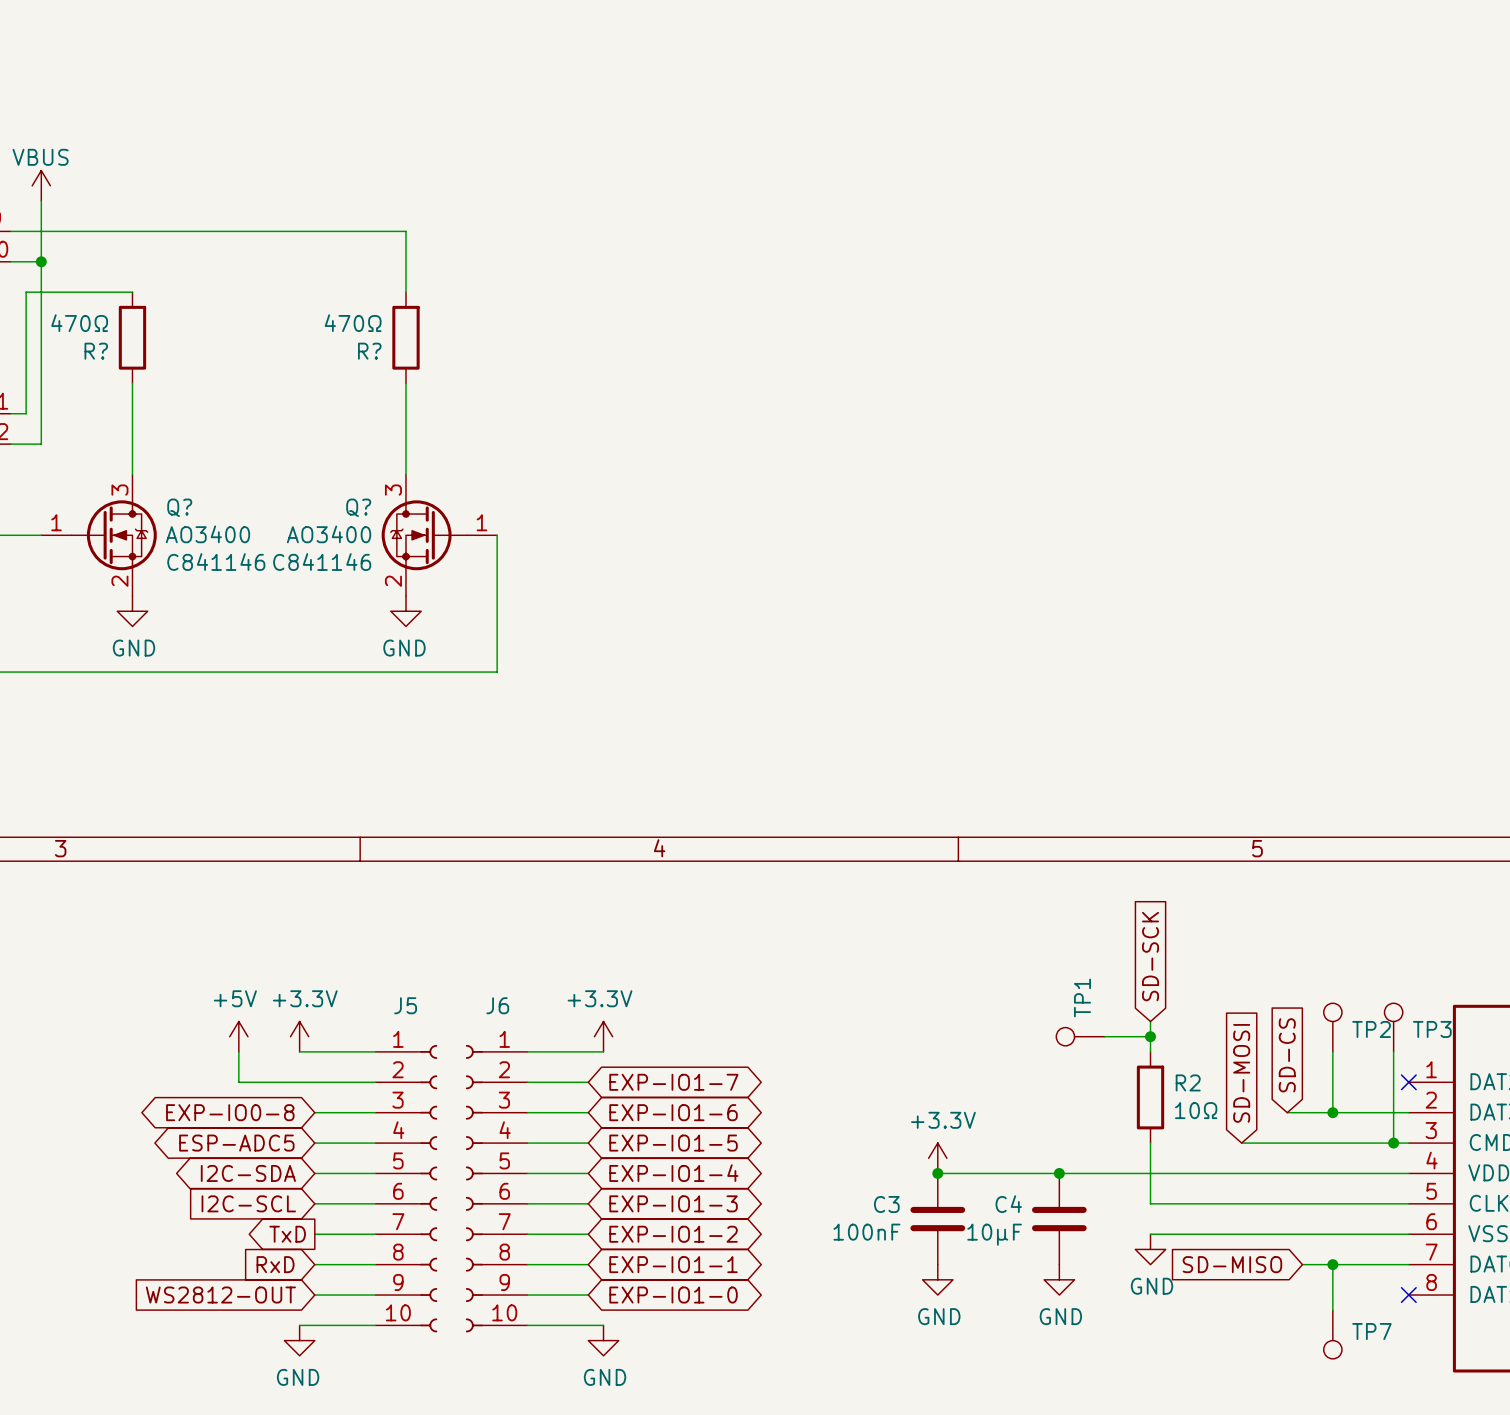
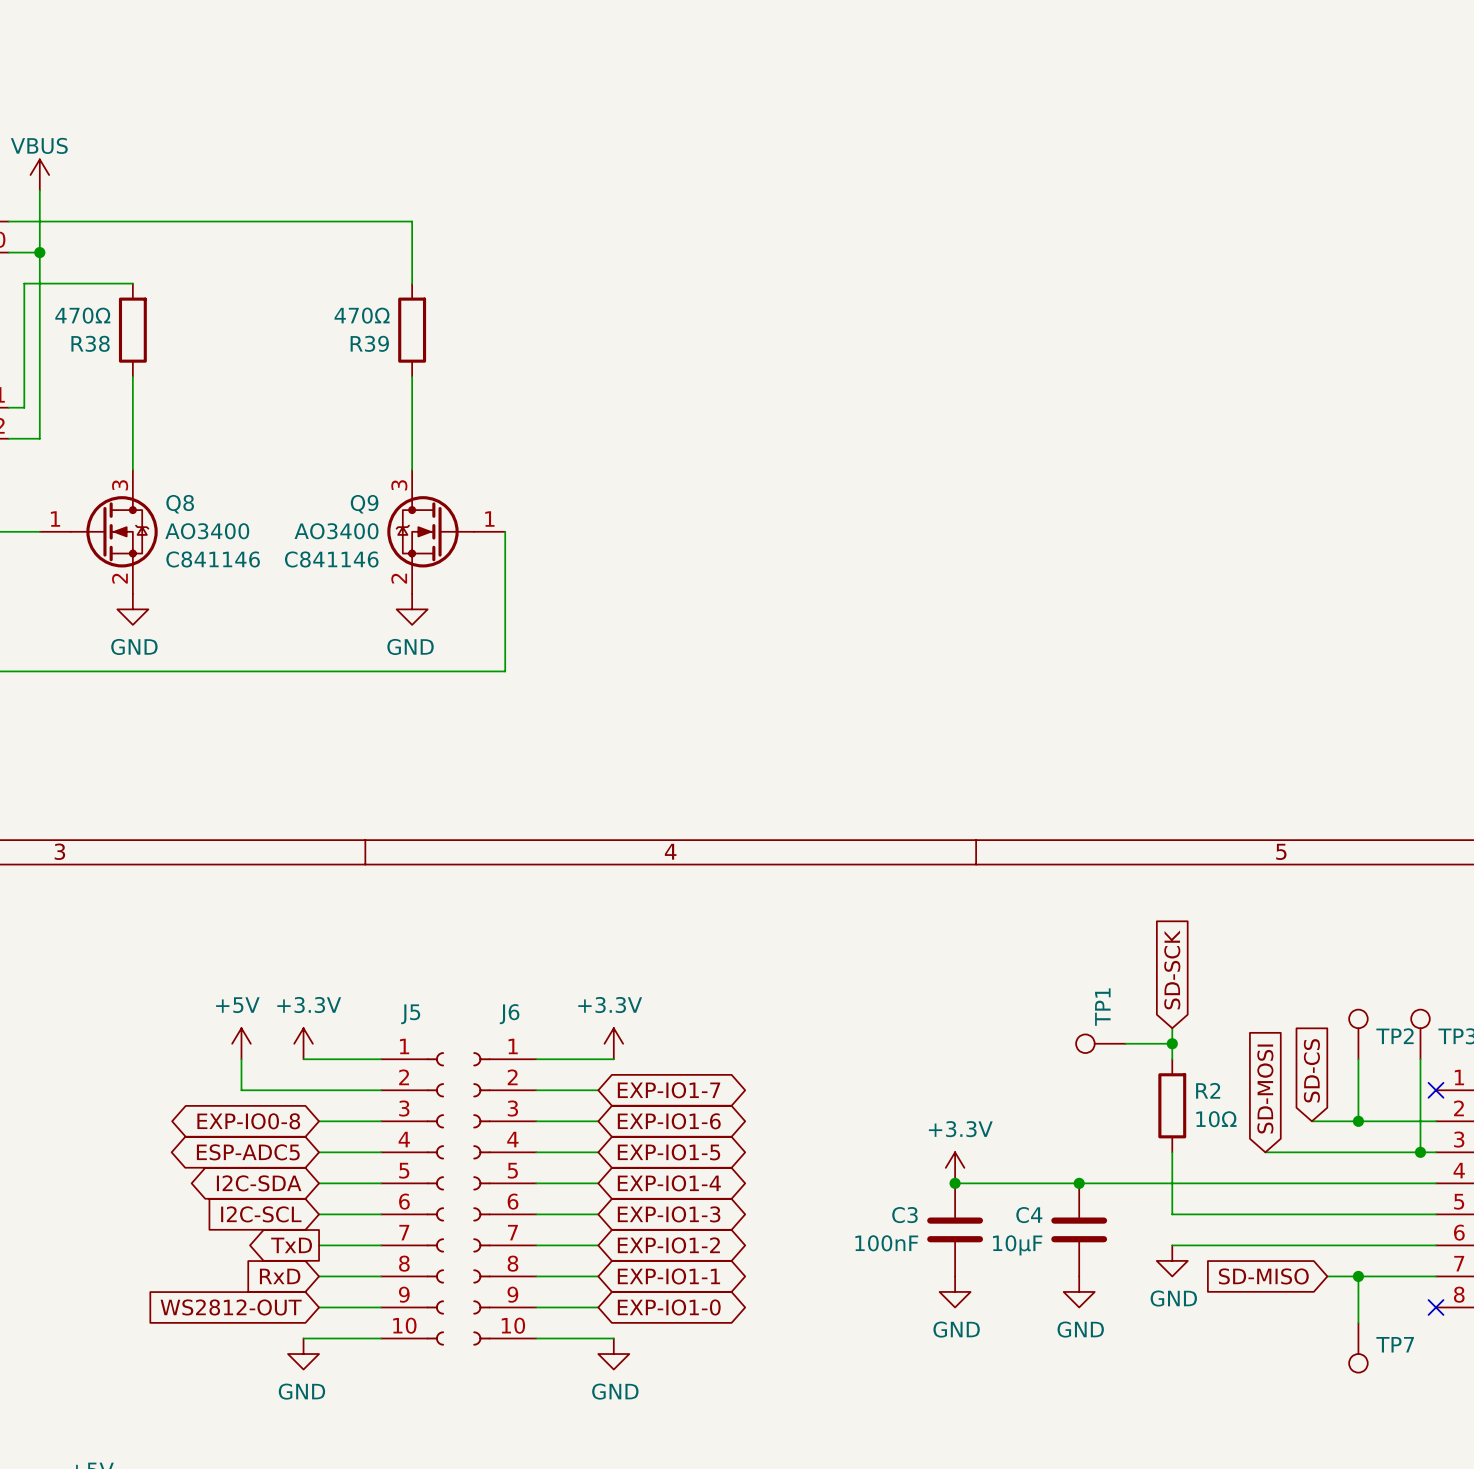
R? name: R? (96, 351) -> R38 (90, 343)
R? name: R? (369, 351) -> R39 (369, 343)
Q? name: Q? (179, 507) -> Q8 (180, 504)
Q? name: Q? (358, 507) -> Q9 (364, 504)

